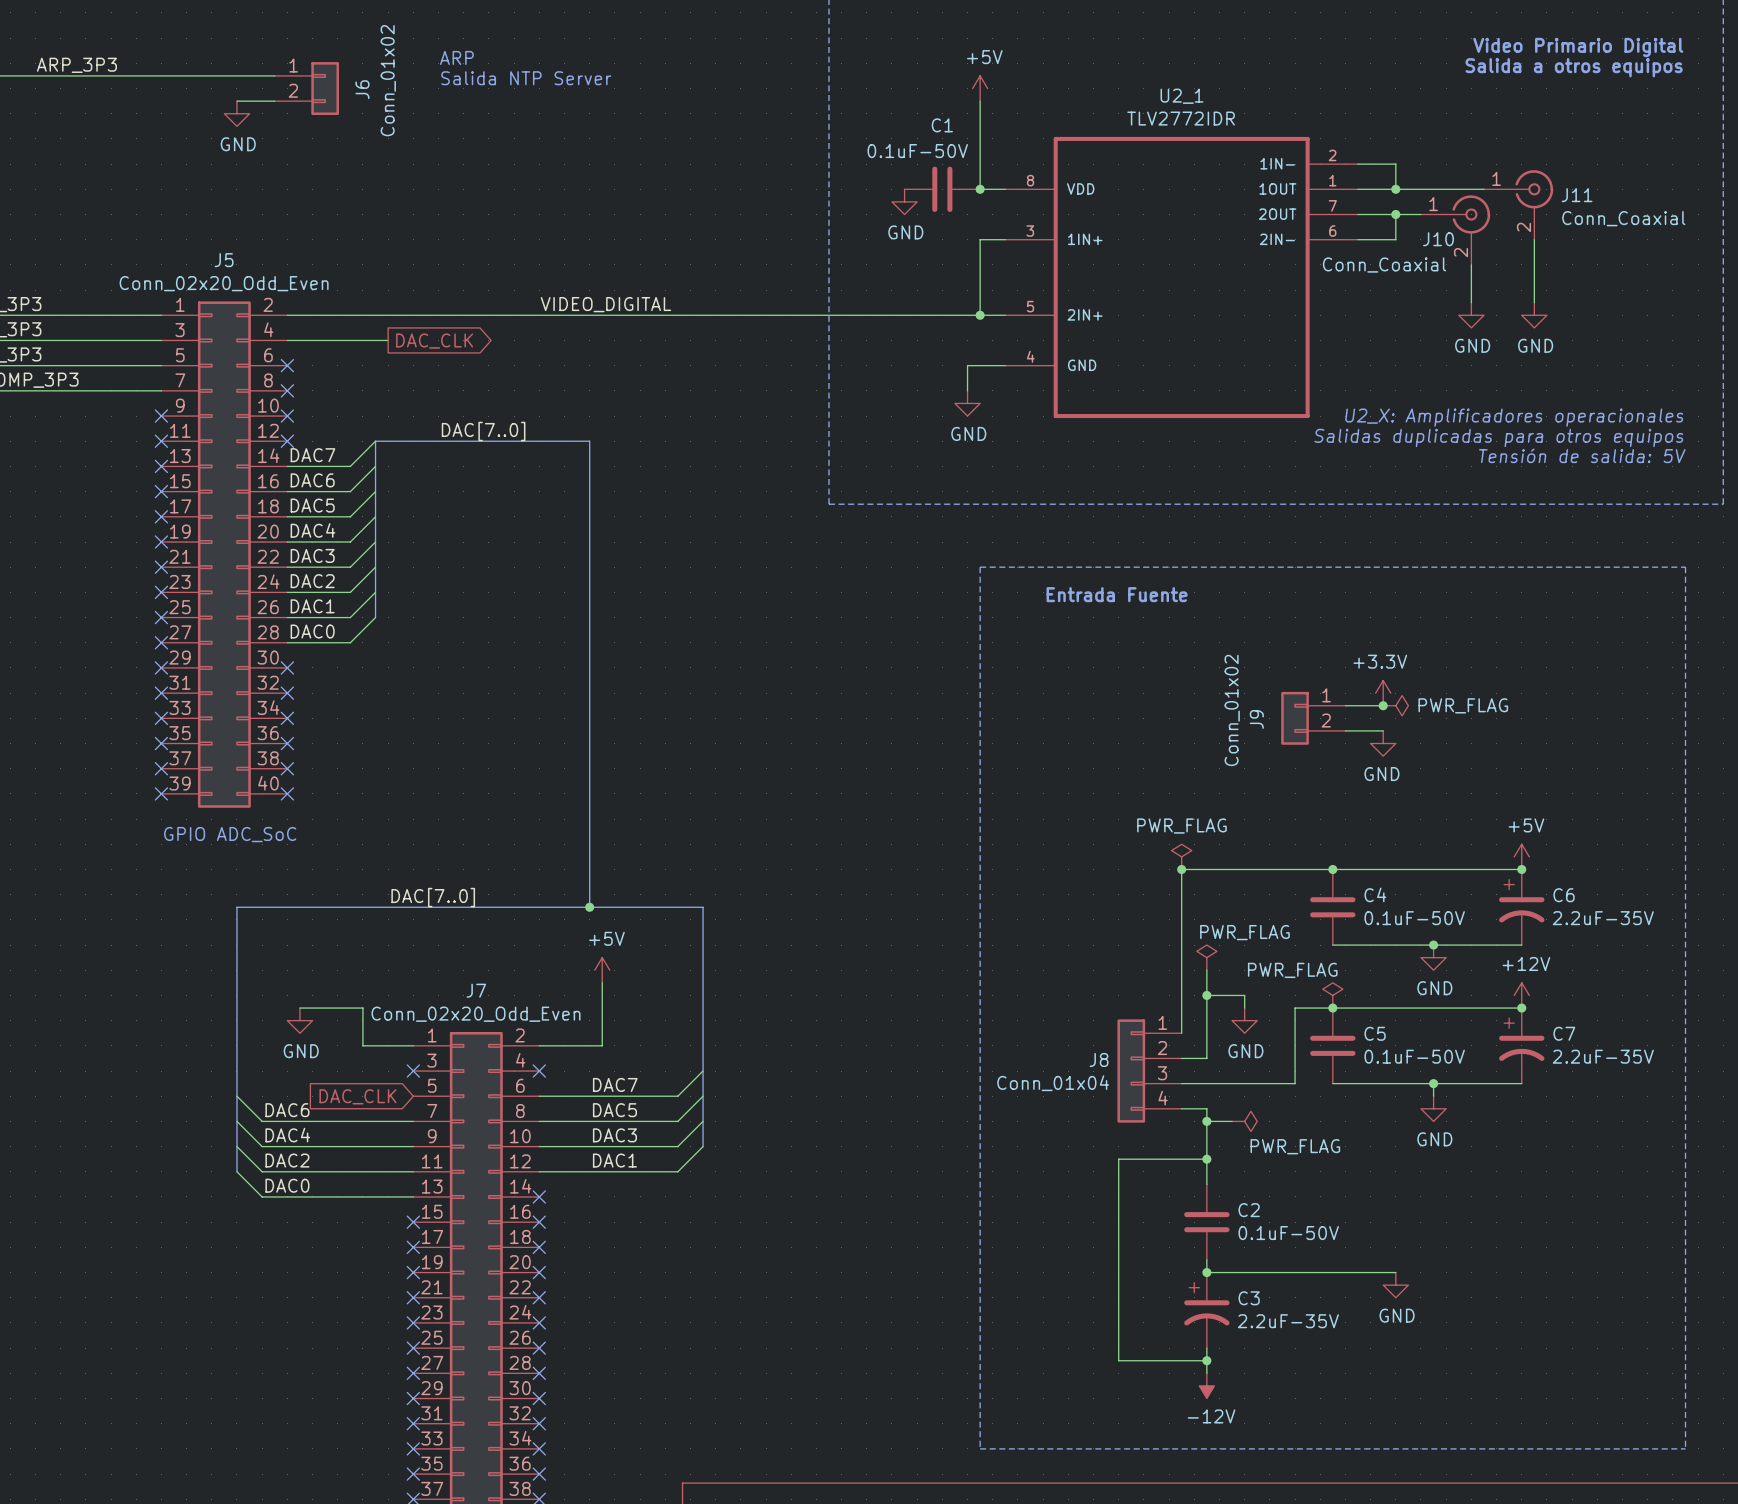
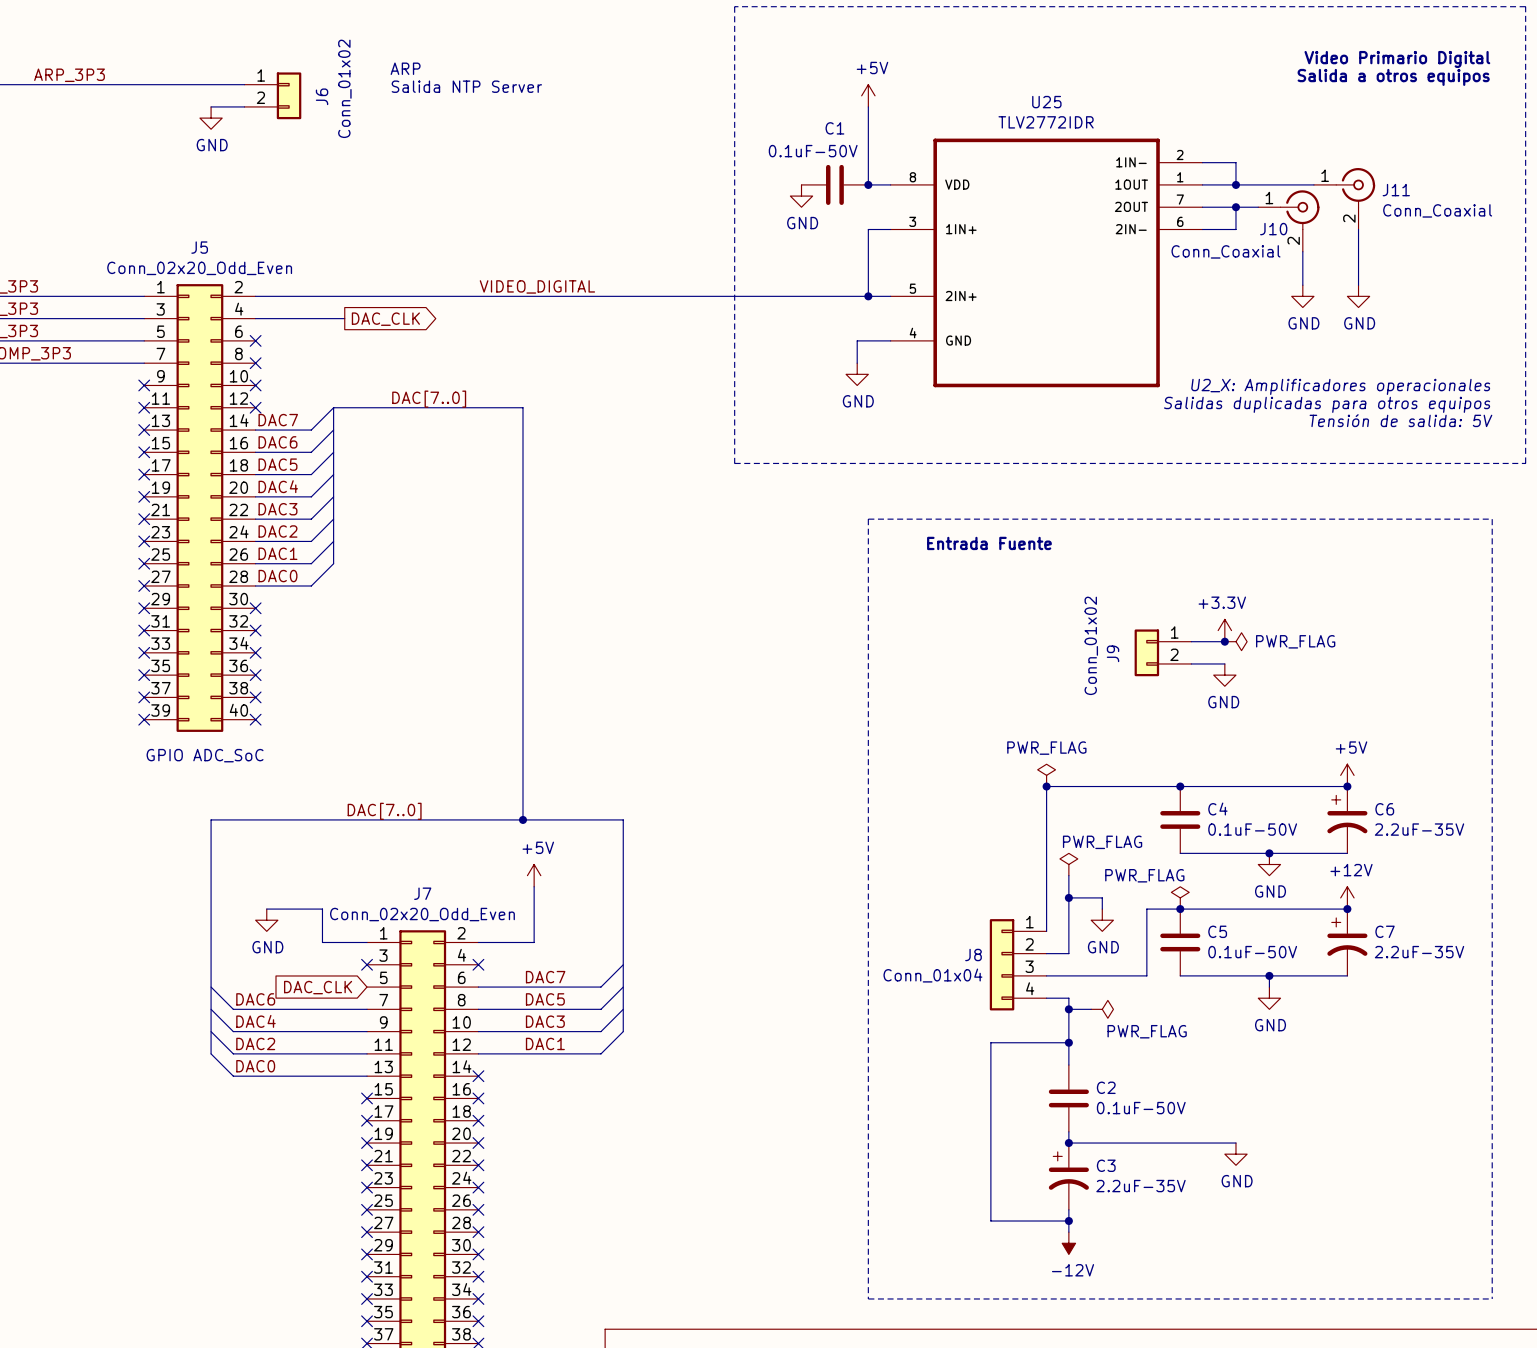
U2_1 name: U2_1 (1181, 96) -> U25 (1046, 102)

